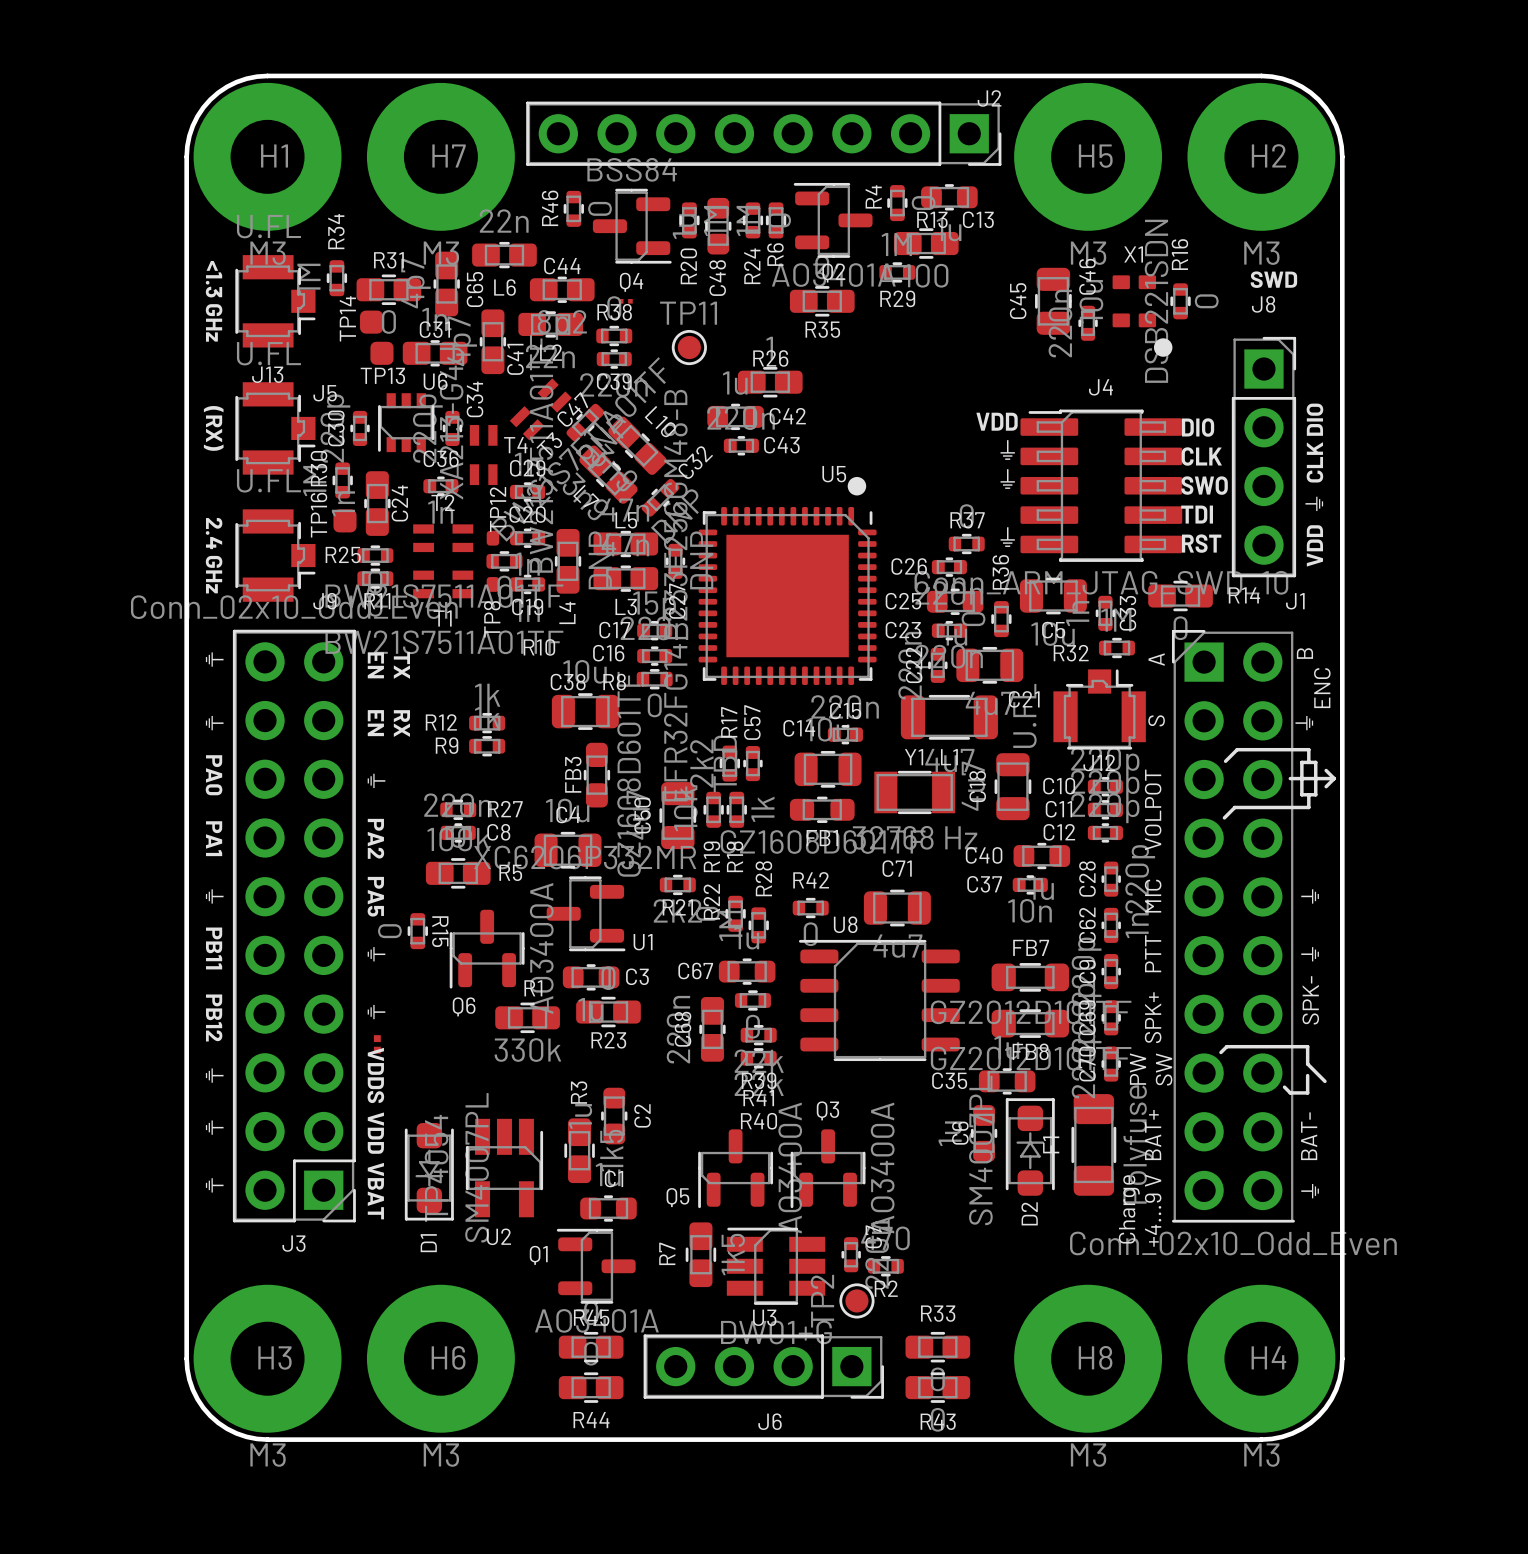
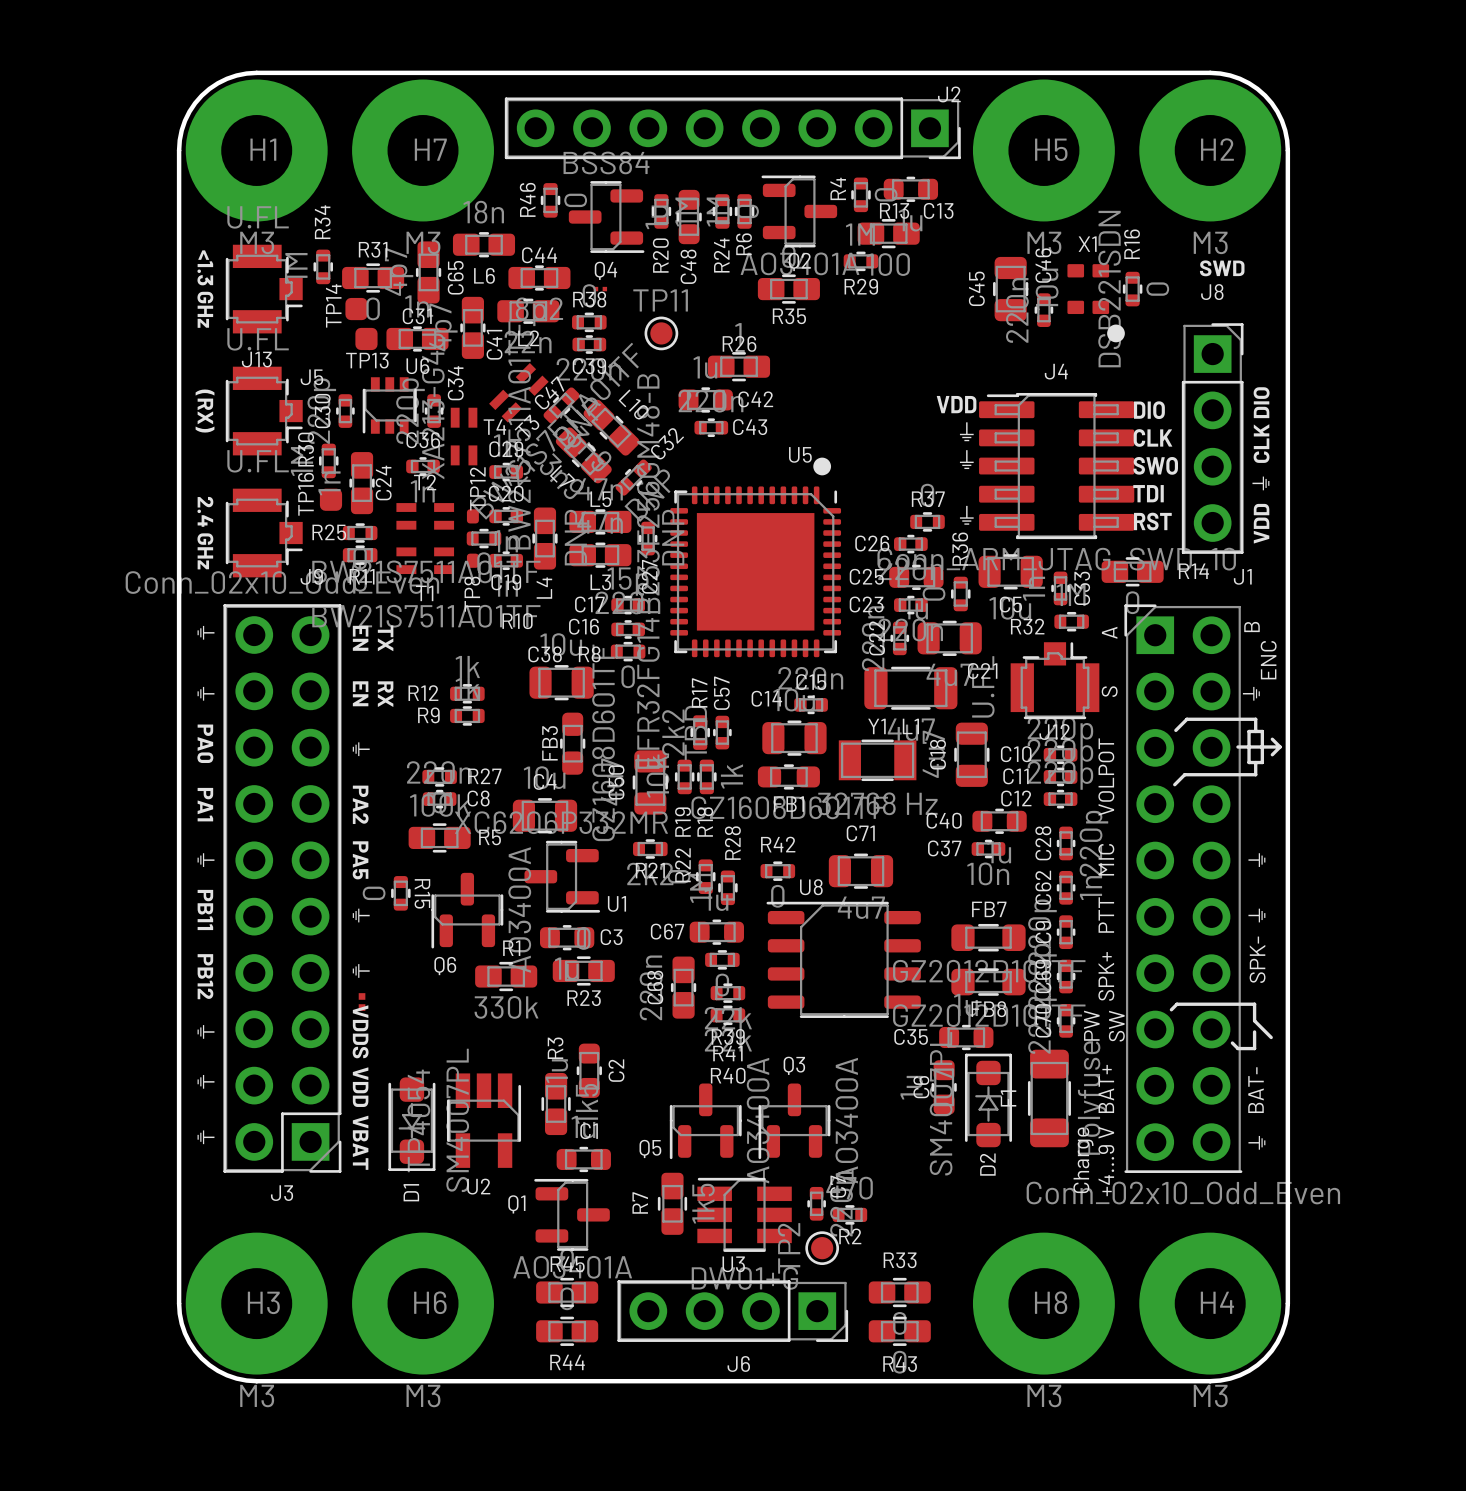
L6 value: 22n (504, 221) -> 18n (483, 212)

